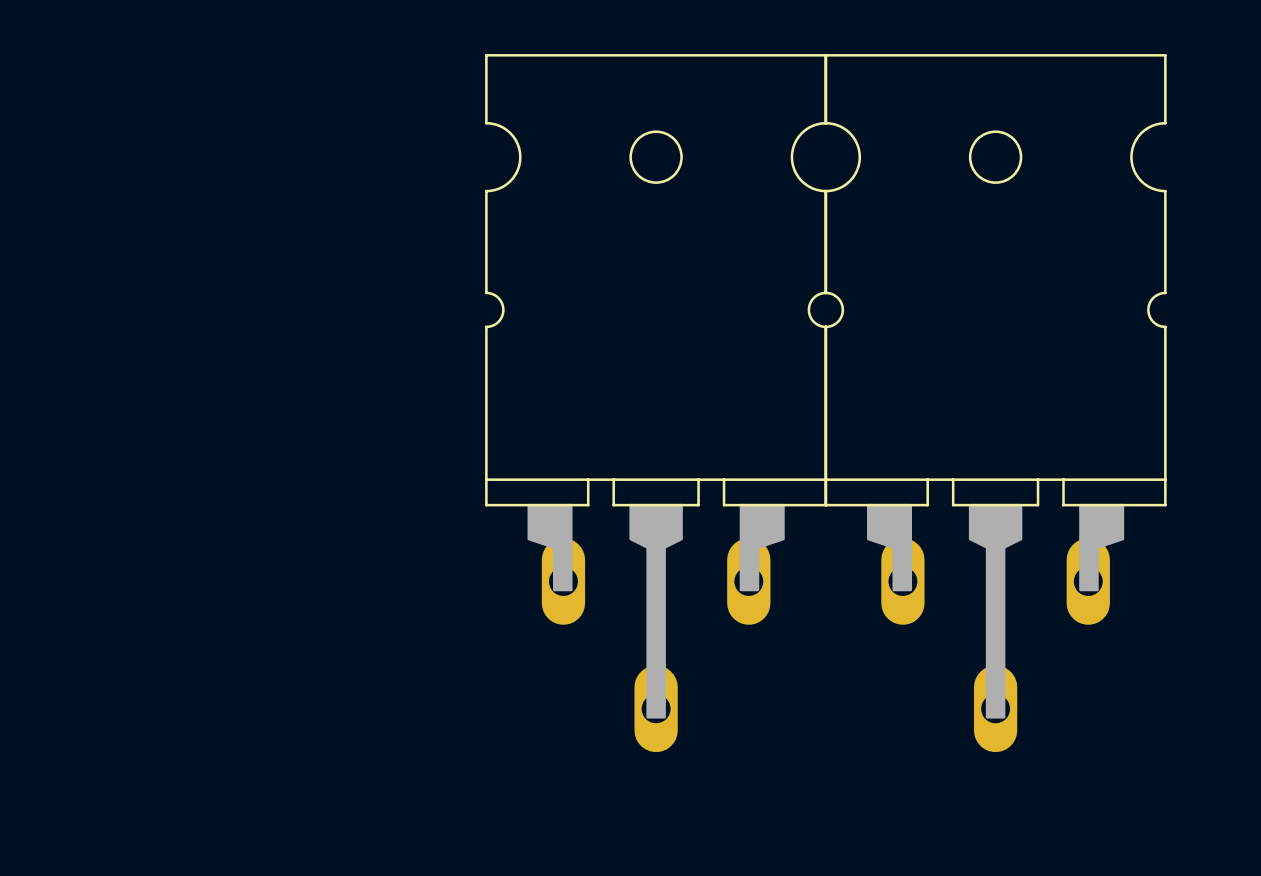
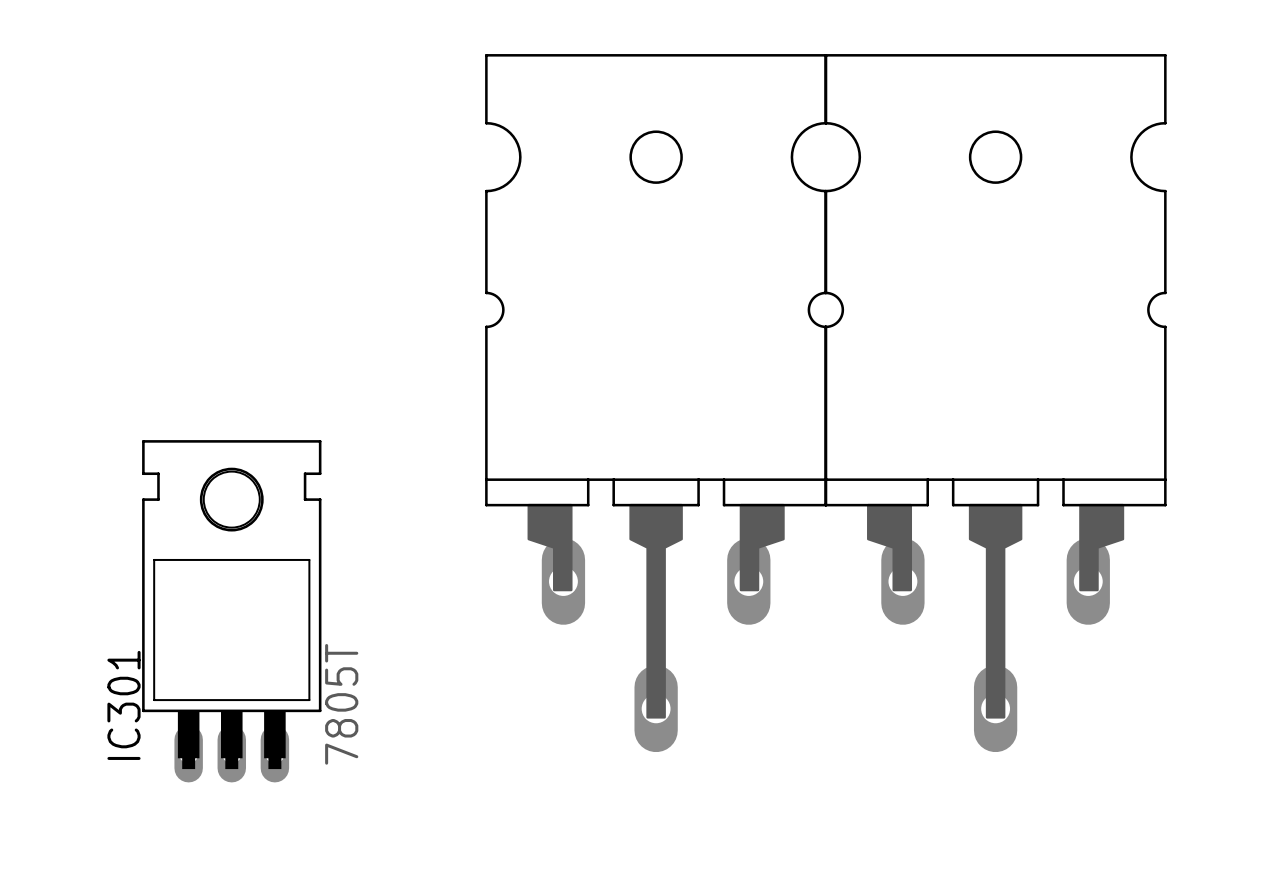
IC301: none -> 7805T (231, 611)

